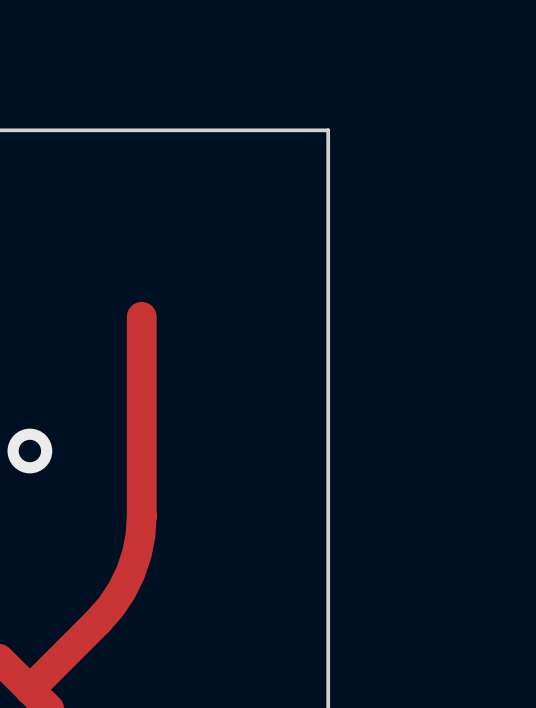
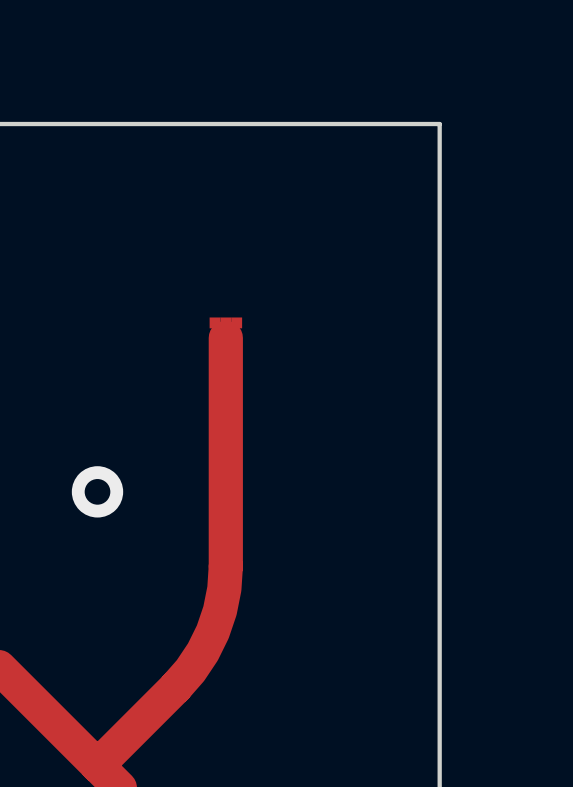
part: none -> (225, 322)

